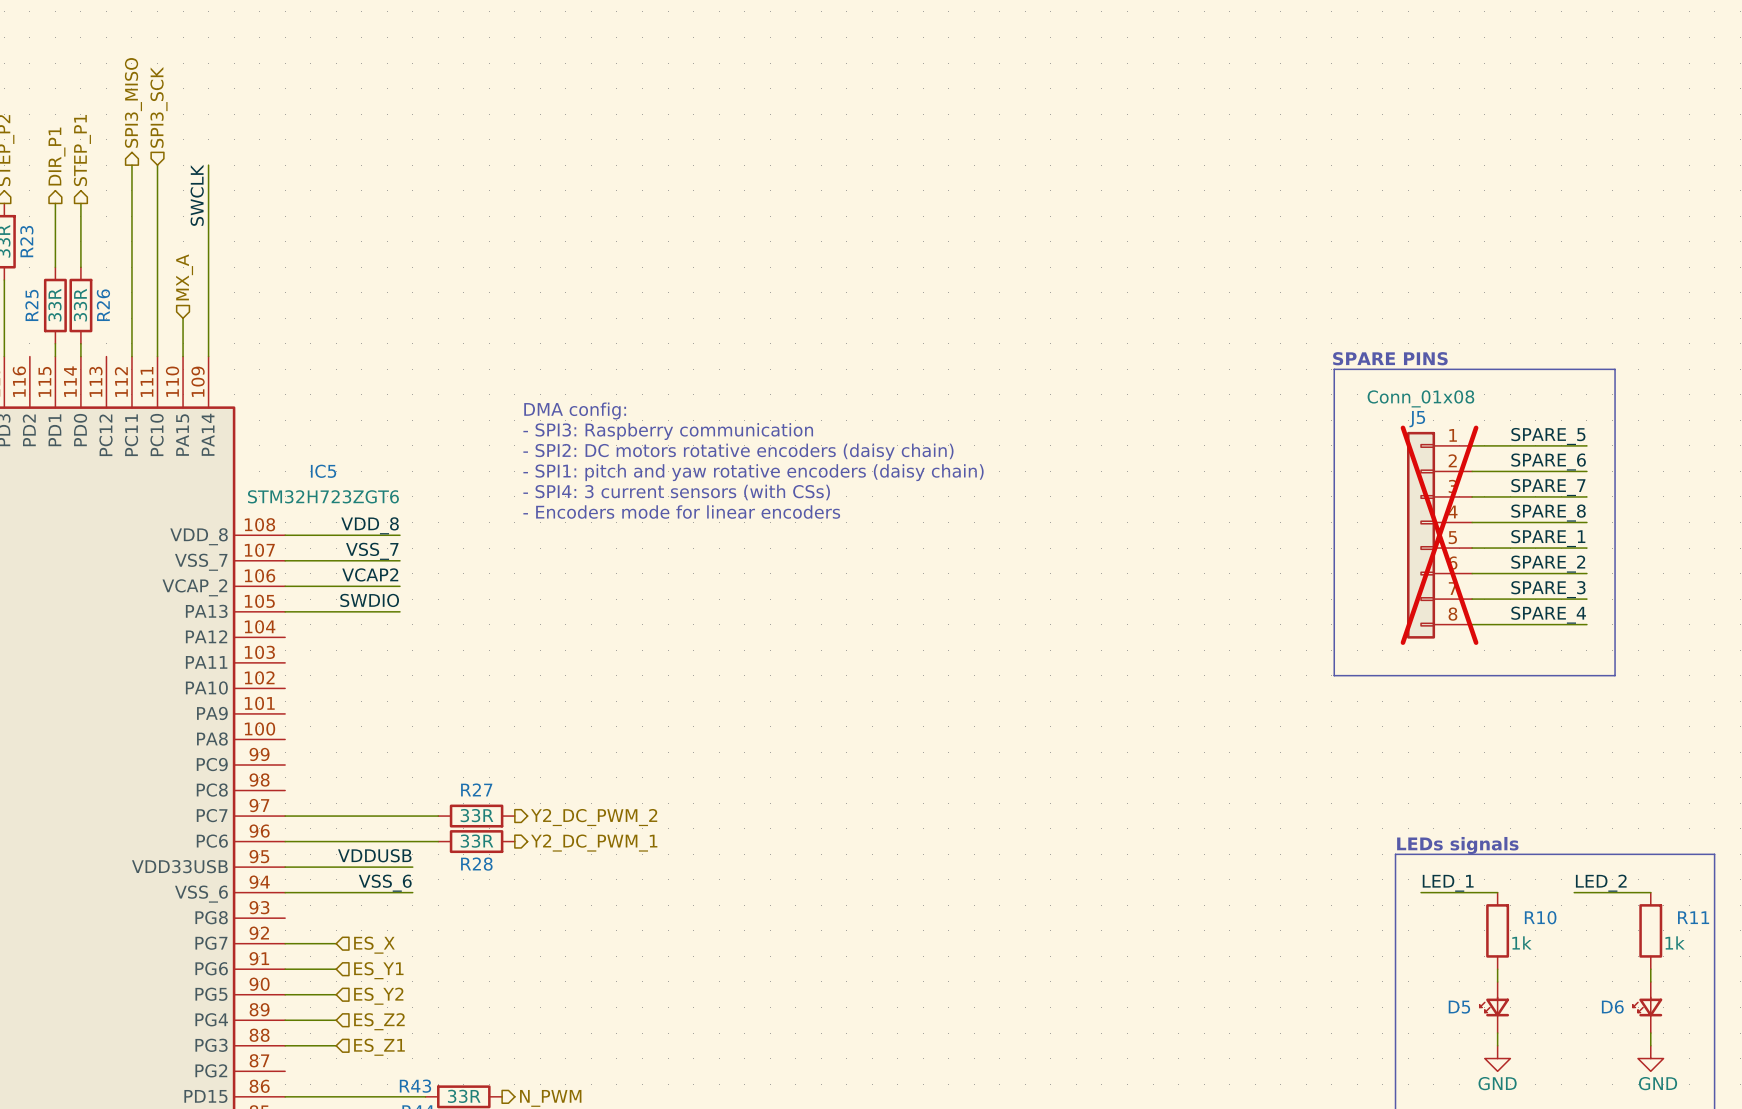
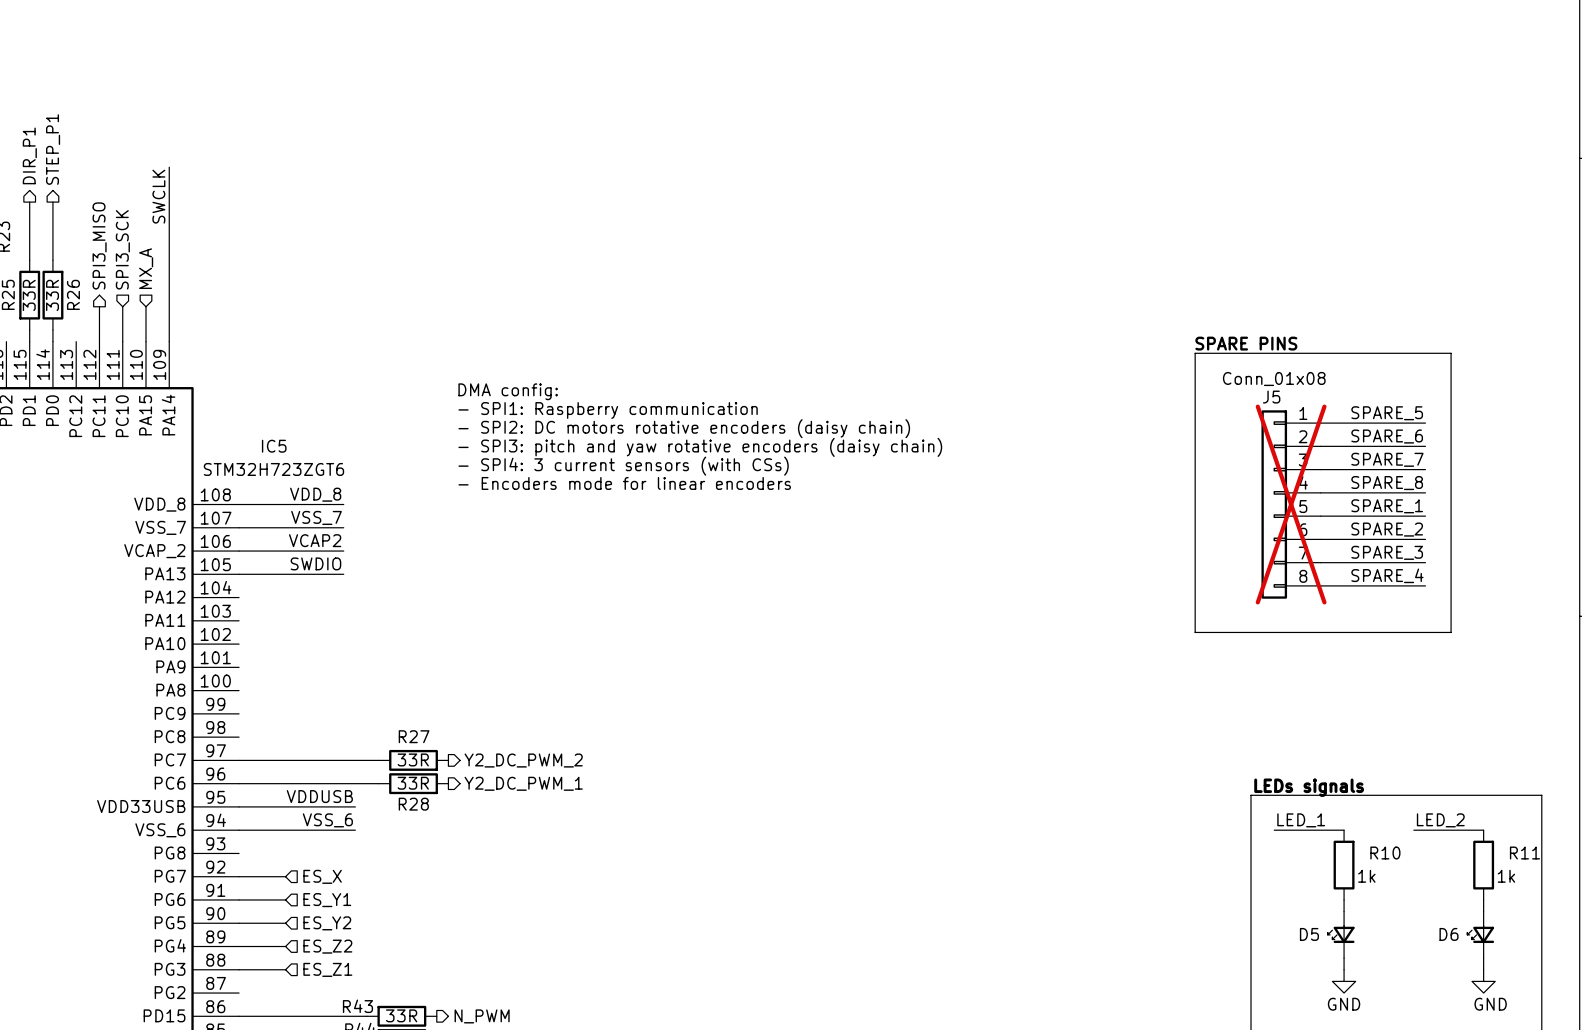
hierarchical label position: SPI3_MISO (133, 102) -> SPI3_MISO (99, 245)
hierarchical label position: SPI3_SCK (158, 107) -> SPI3_SCK (122, 249)
wire: (131, 165) (131, 318) -> none
wire: (157, 165) (157, 318) -> none
text: - SPI3: Raspberry communication (668, 431) -> - SPI1: Raspberry communication (608, 410)
text: - SPI1: pitch and yaw rotative encoders (daisy chain) (753, 472) -> - SPI3: pitch and yaw rotative encoders (daisy chain) (700, 447)

